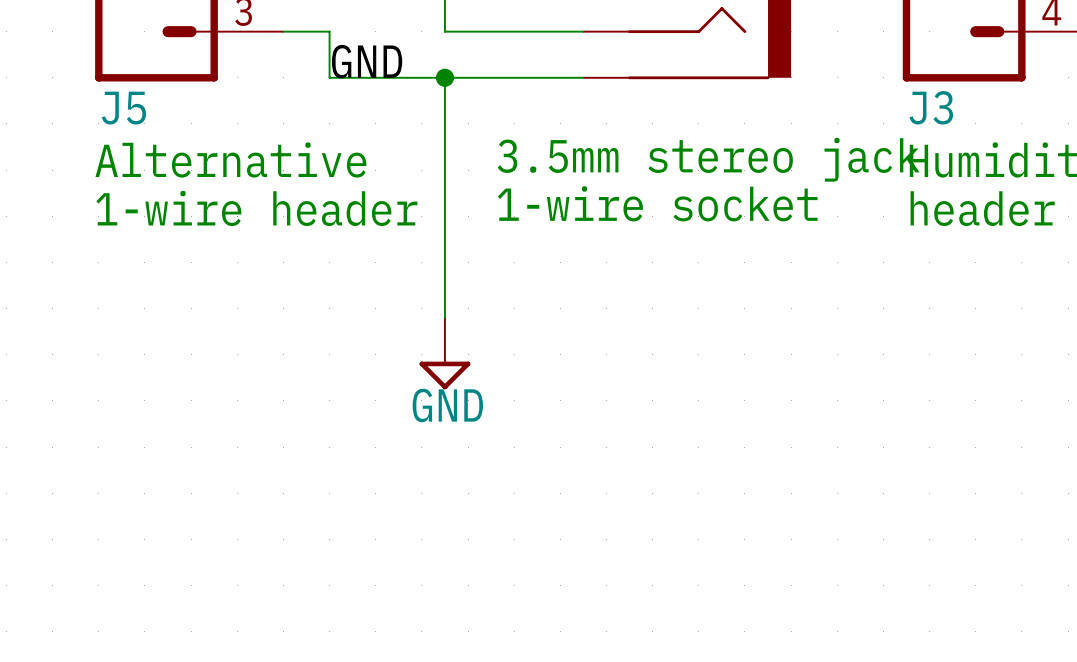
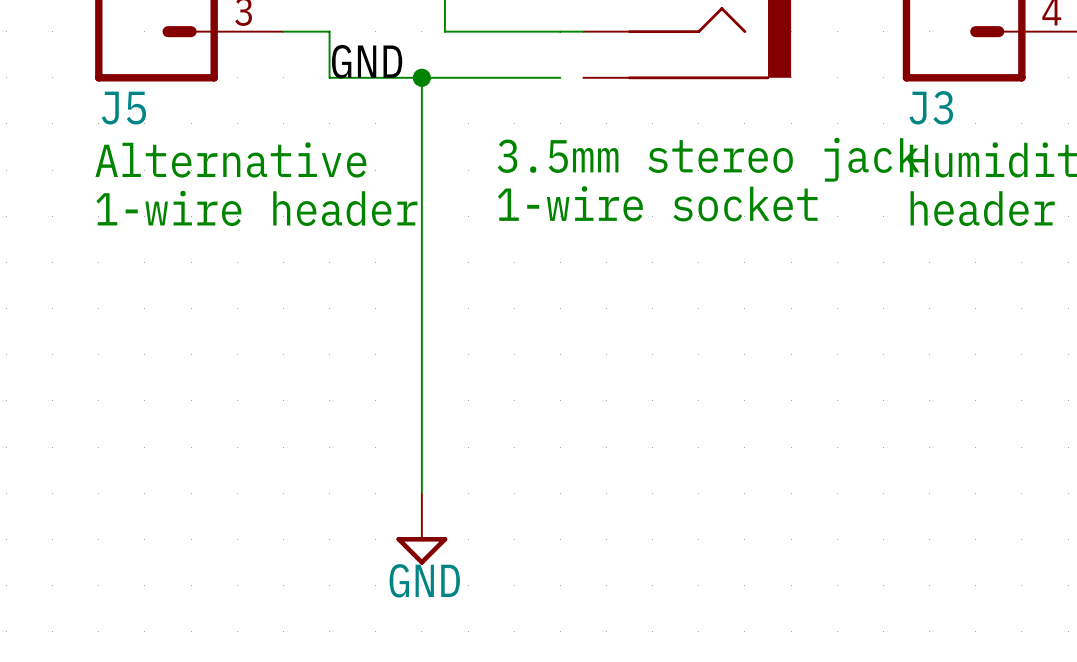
wire: none -> (421, 77) (421, 493)
wire: (444, 77) (444, 317) -> none
junction position: (444, 77) -> (421, 77)
wire: (560, 77) (583, 77) -> none
power symbol position: GND (444, 353) -> GND (421, 528)

